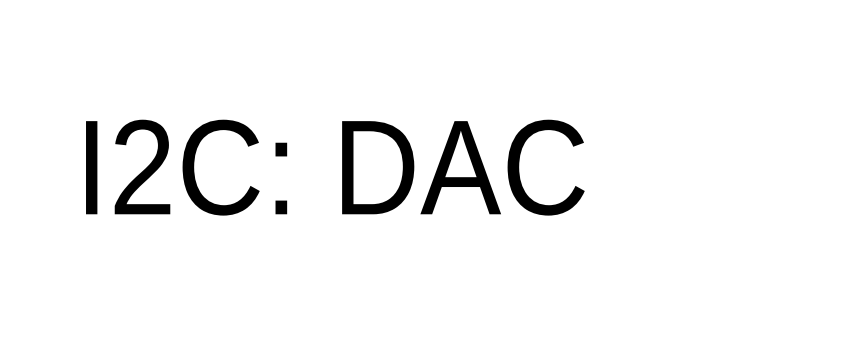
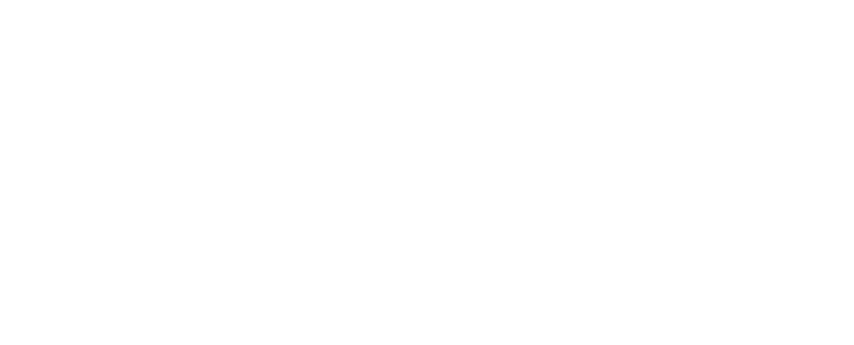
text: I2C: DAC (335, 167) -> none

